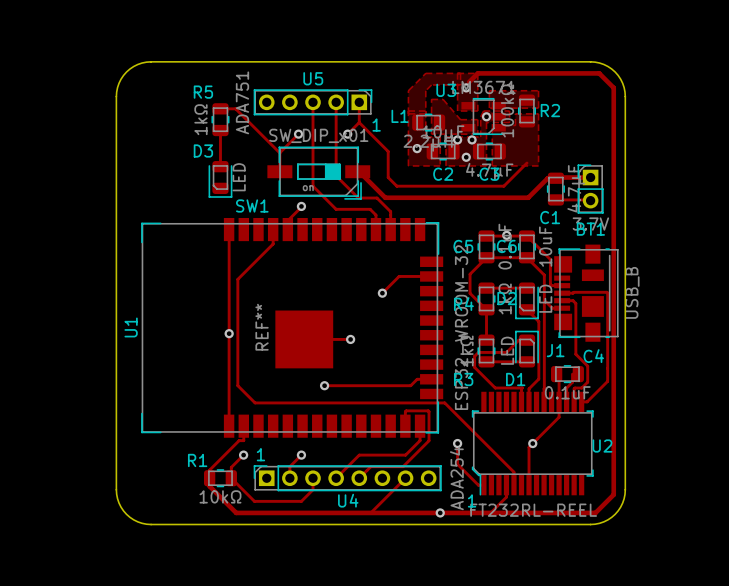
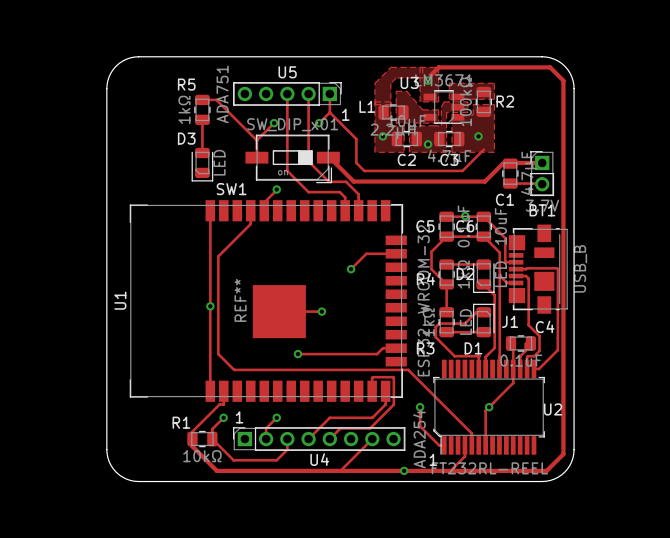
via: (486, 116) -> none
via: (457, 139) -> none
via: (472, 139) -> none
via: none -> (478, 136)

